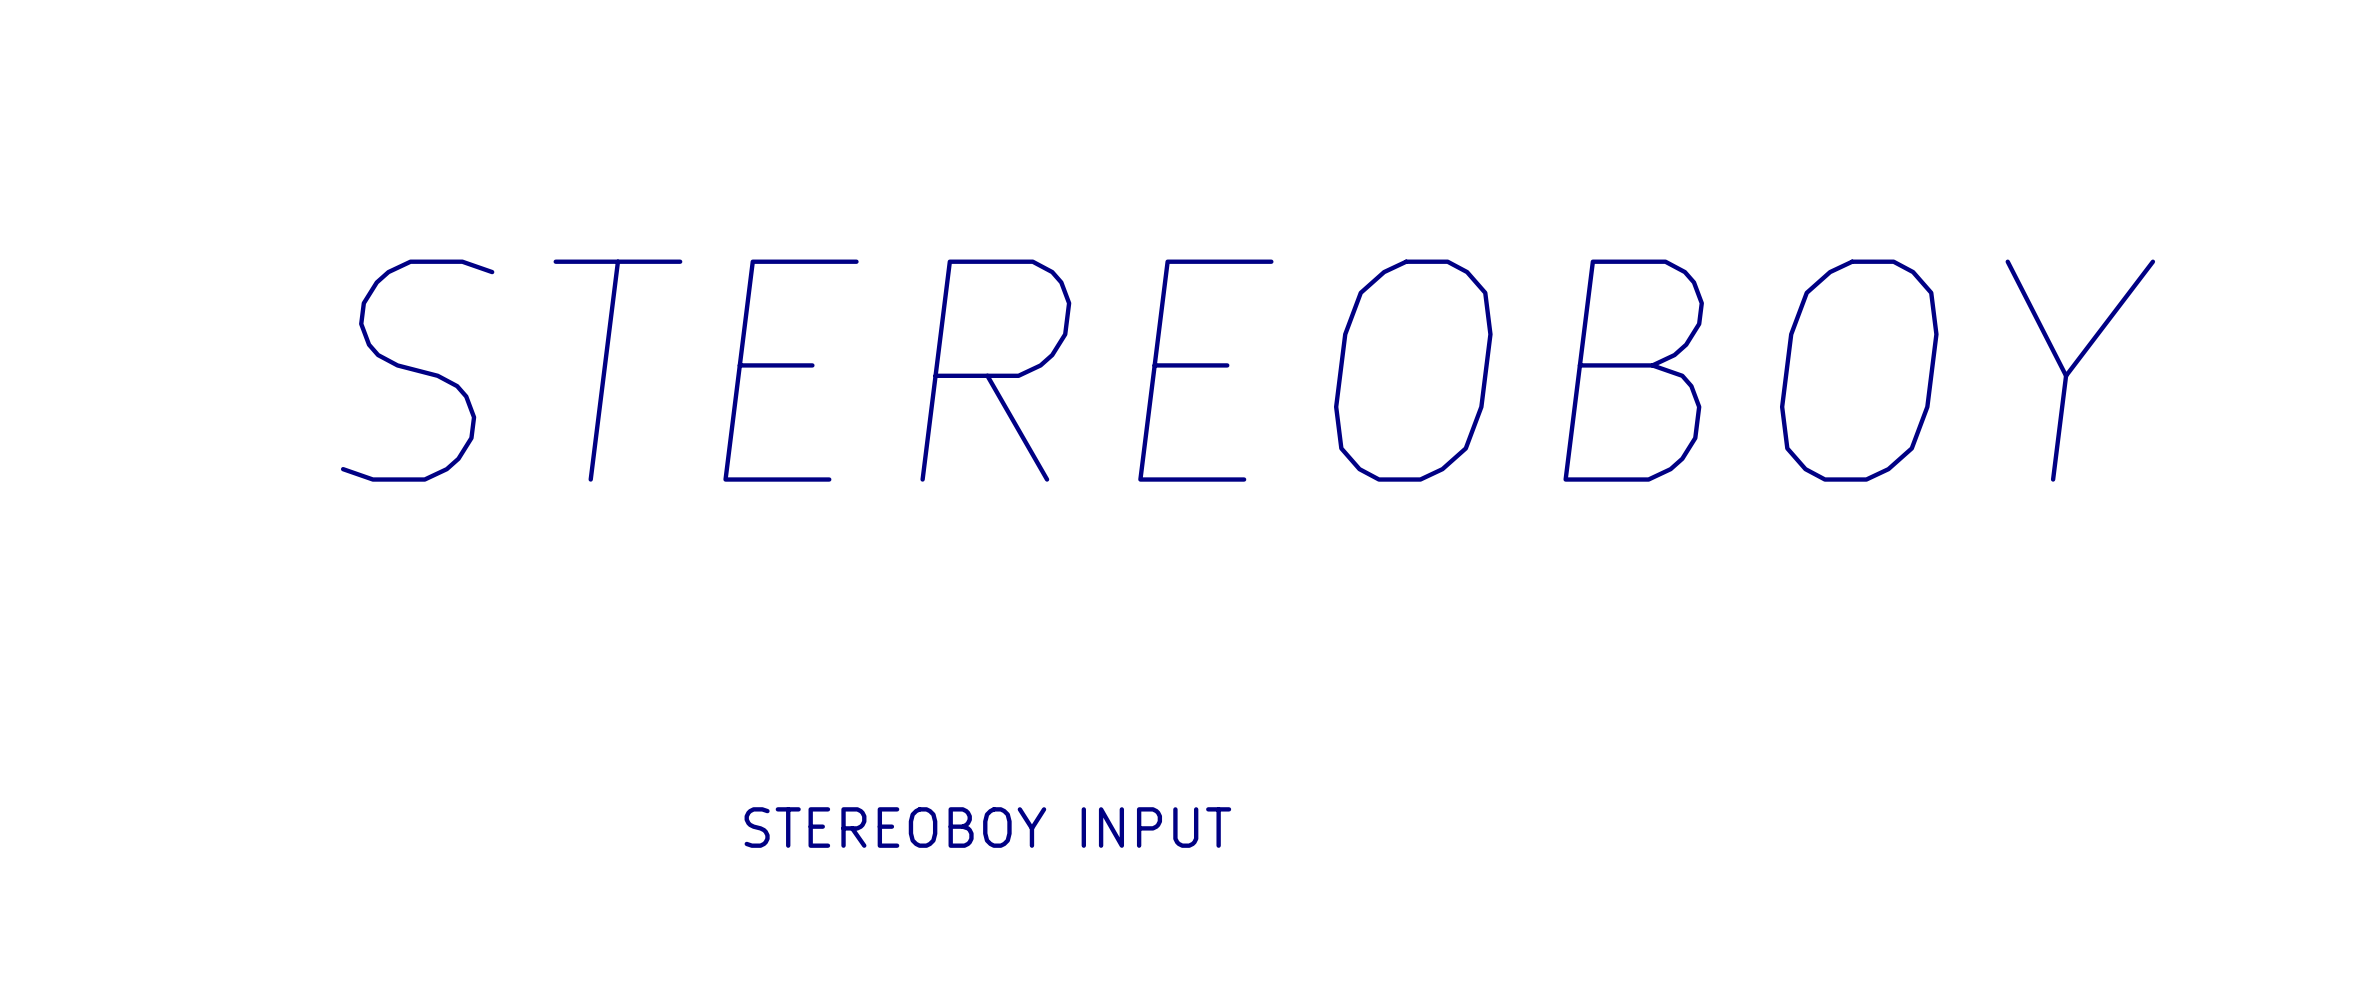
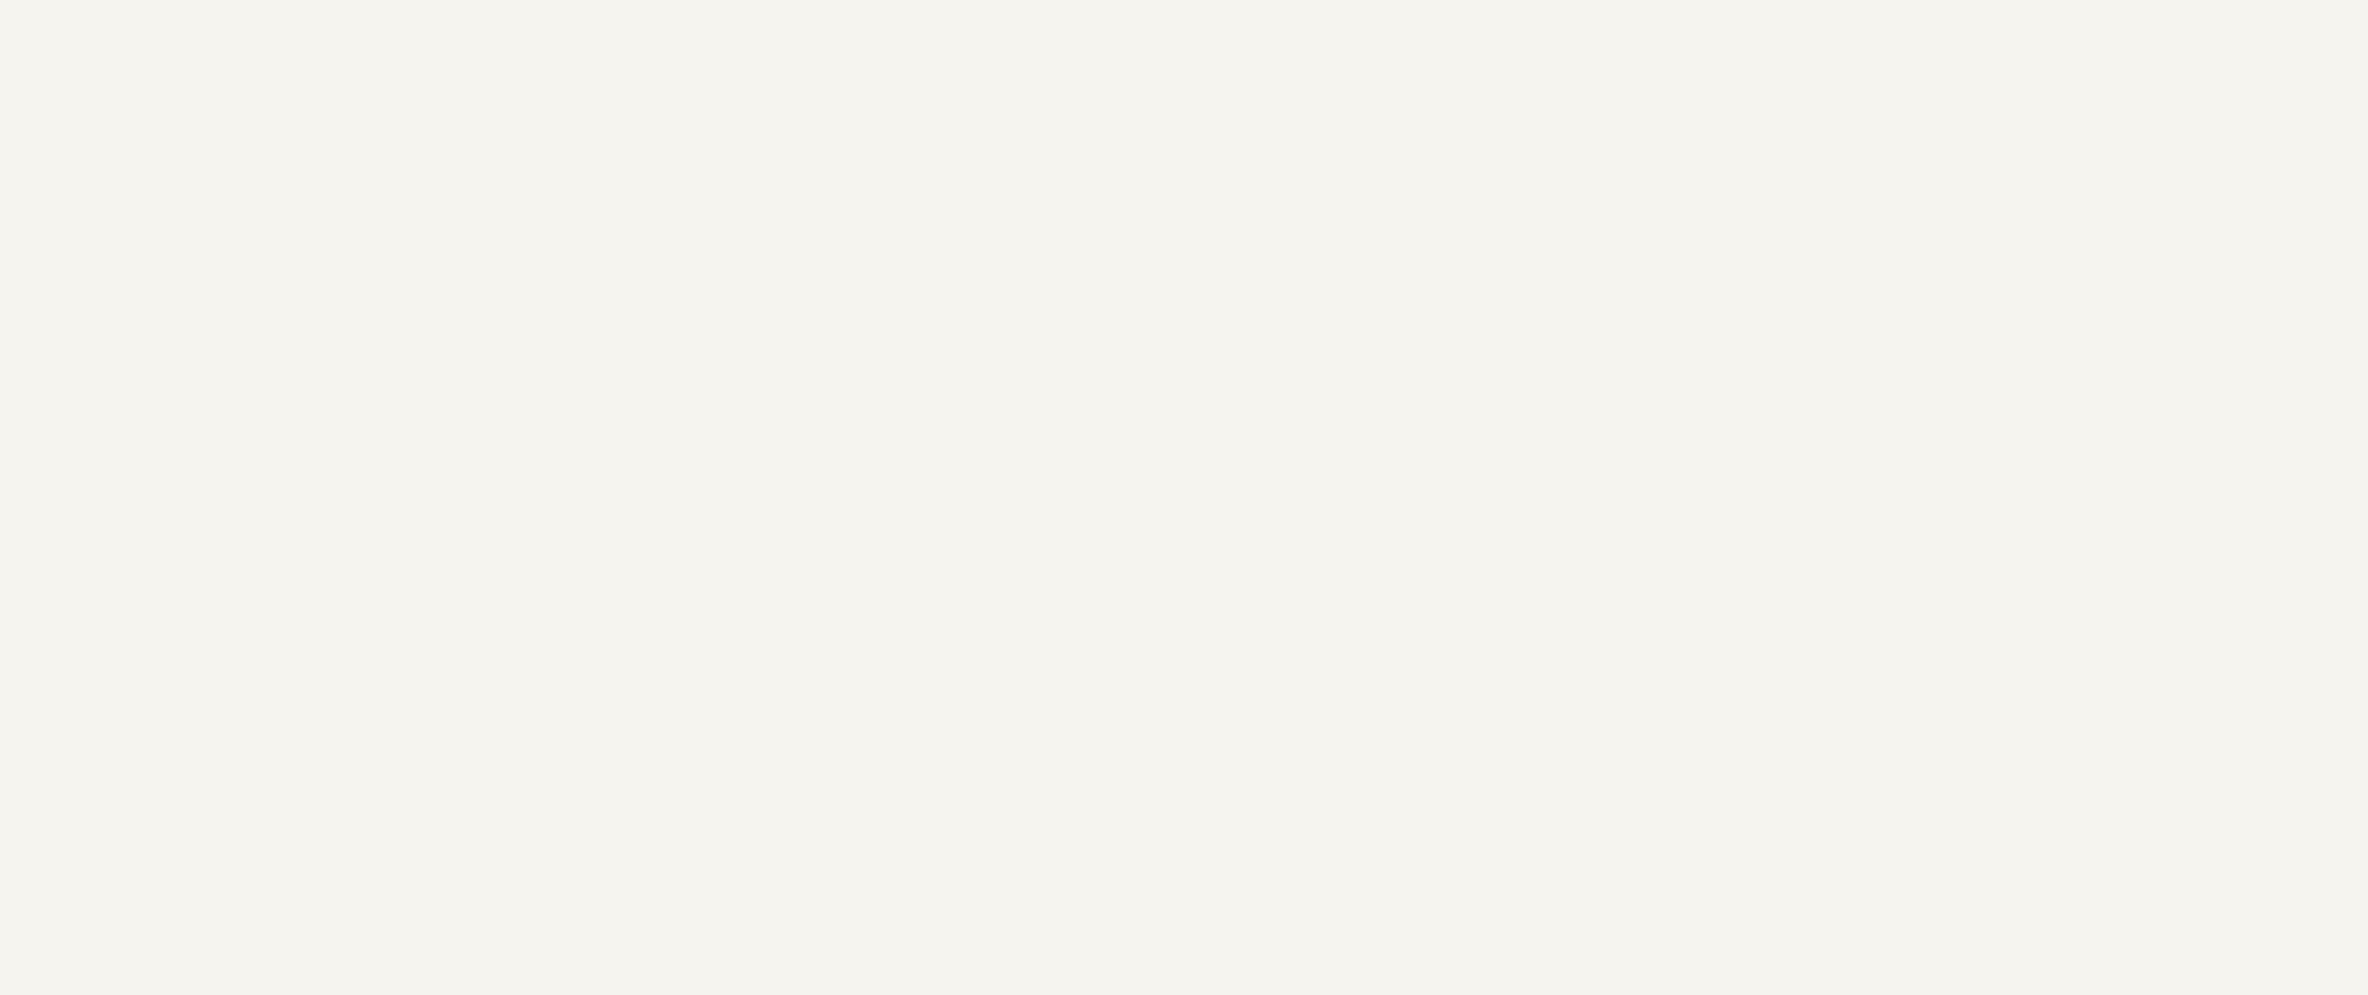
text: STEREOBOY (1248, 370) -> none
text: STEREOBOY INPUT (987, 827) -> none

